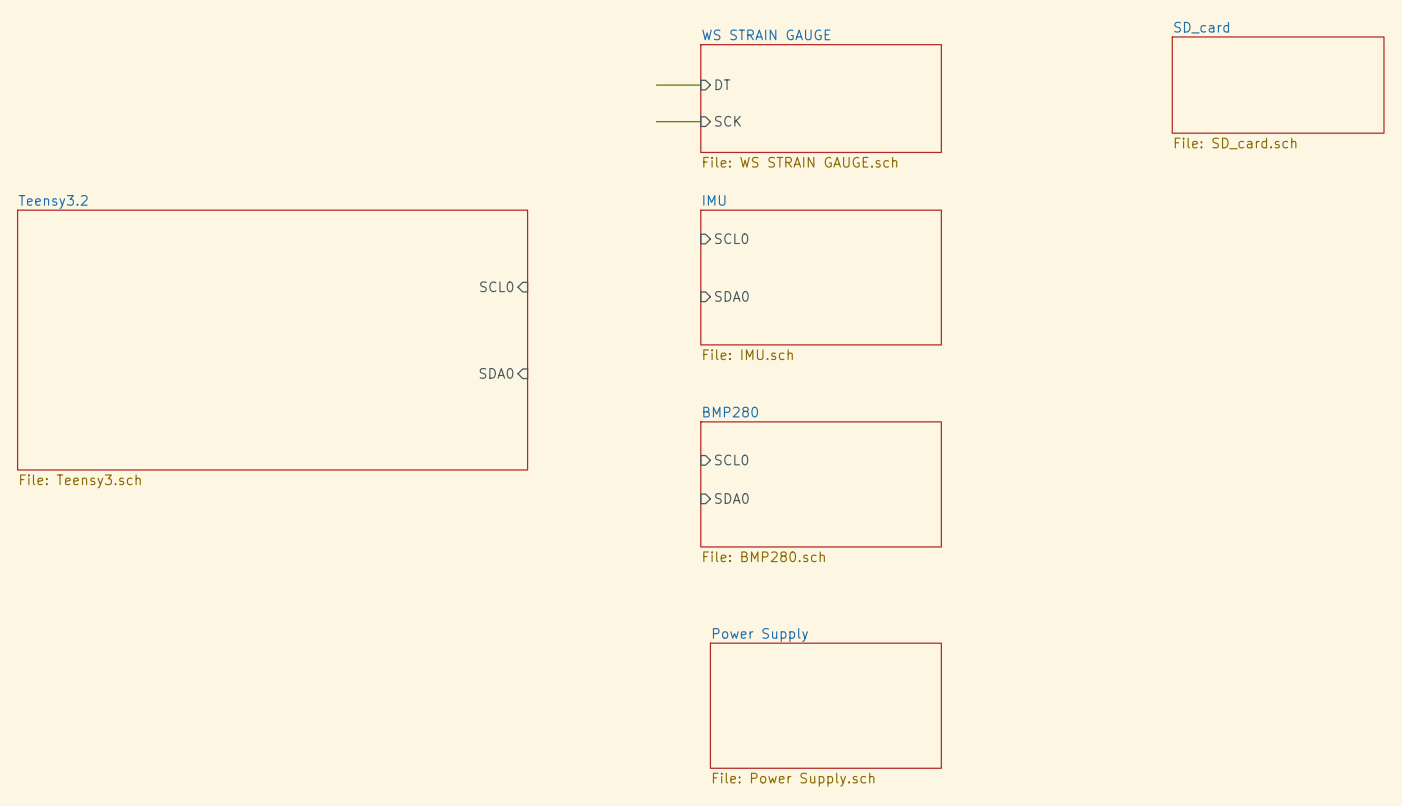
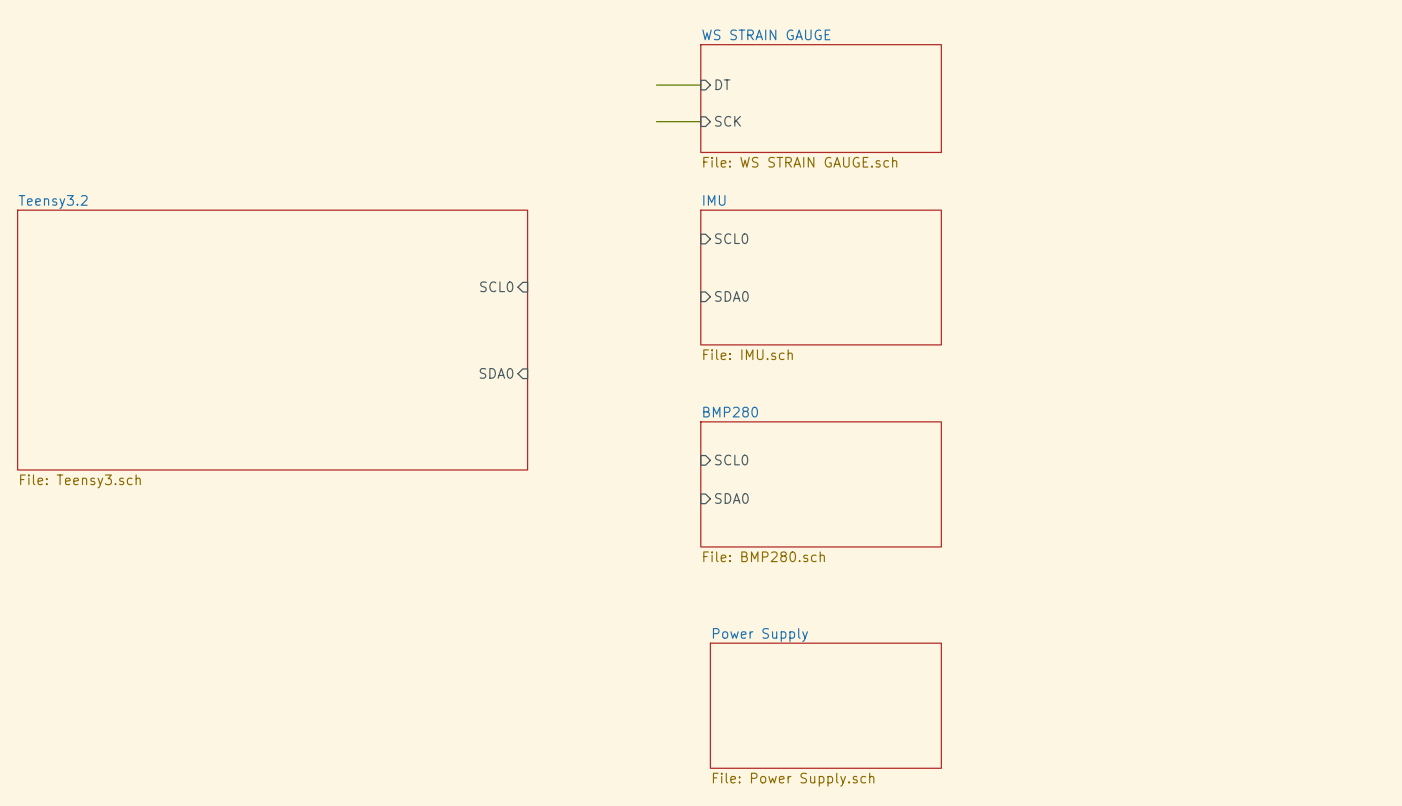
sheet SD_card: File: SD_card.sch (1278, 85) -> none

